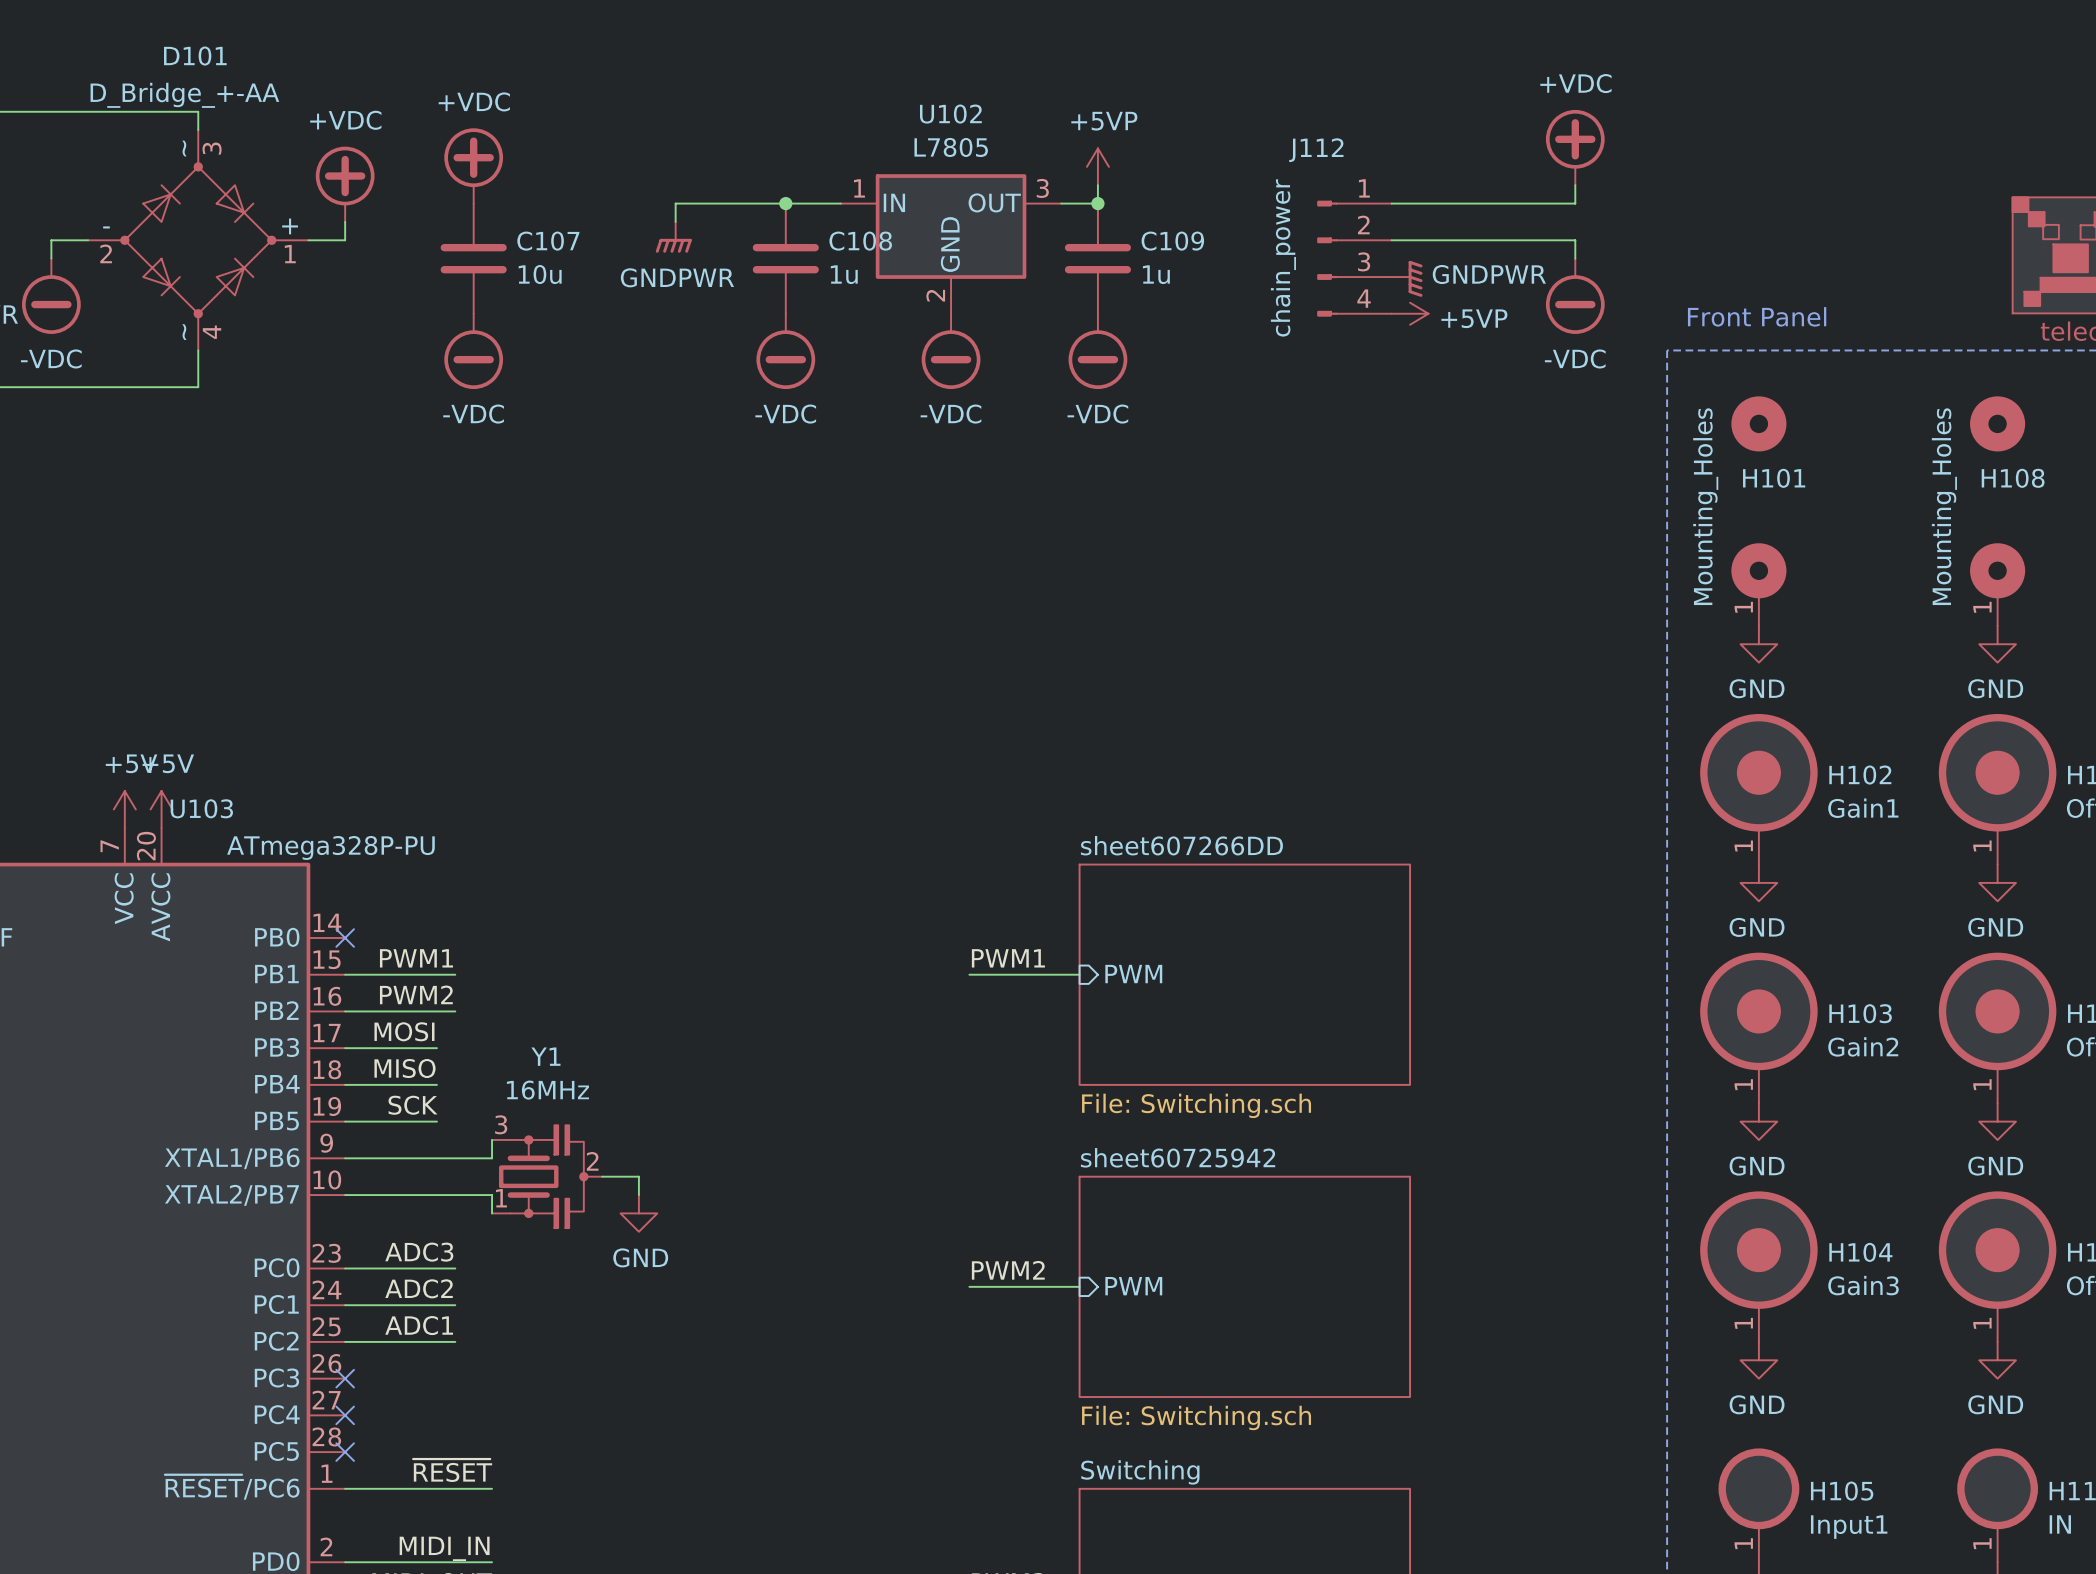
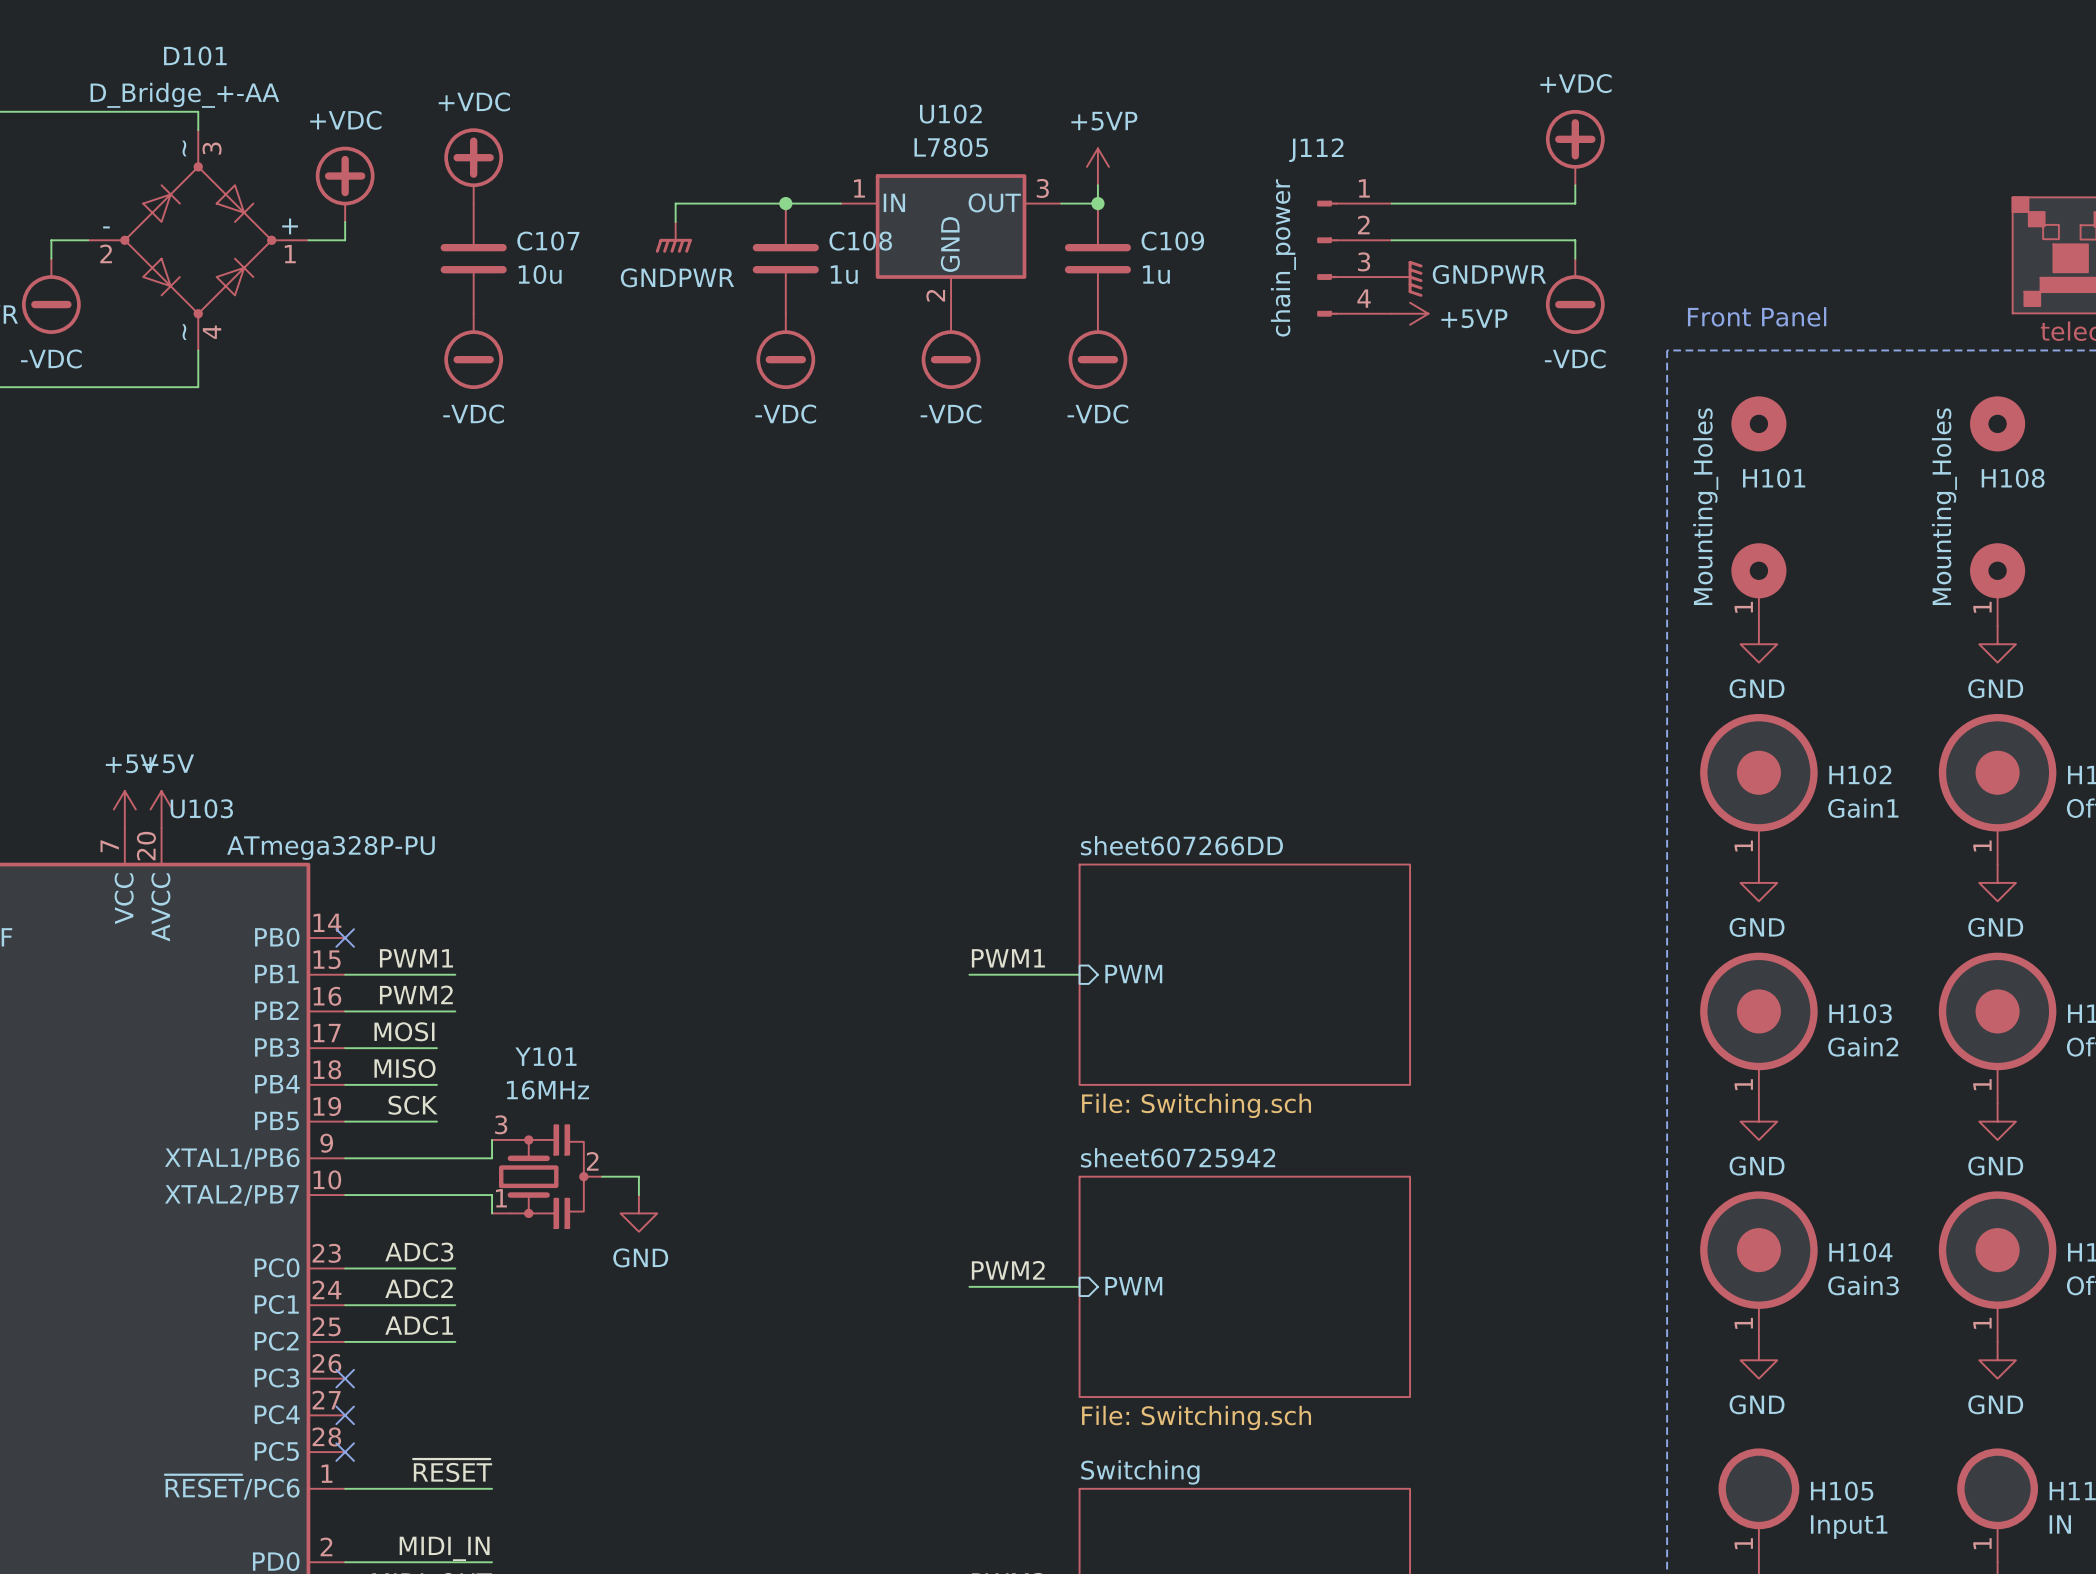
Y1 name: Y1 (545, 1056) -> Y101 (545, 1056)

